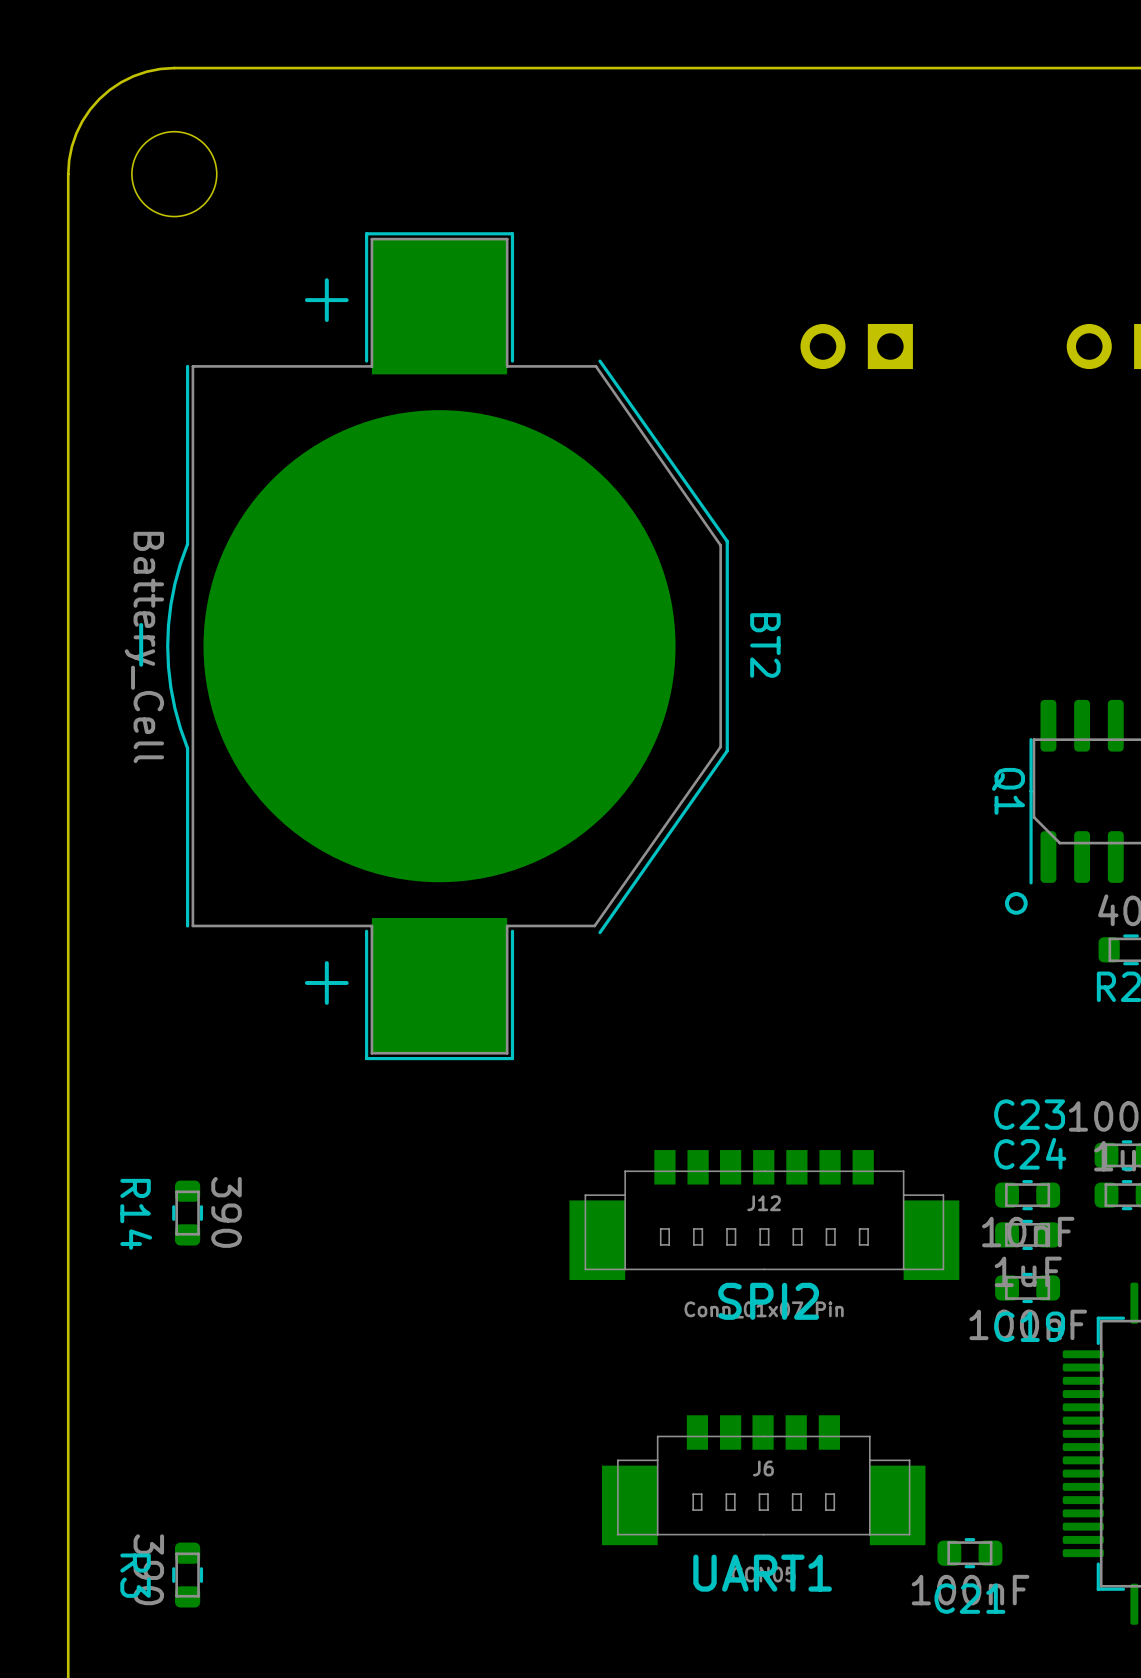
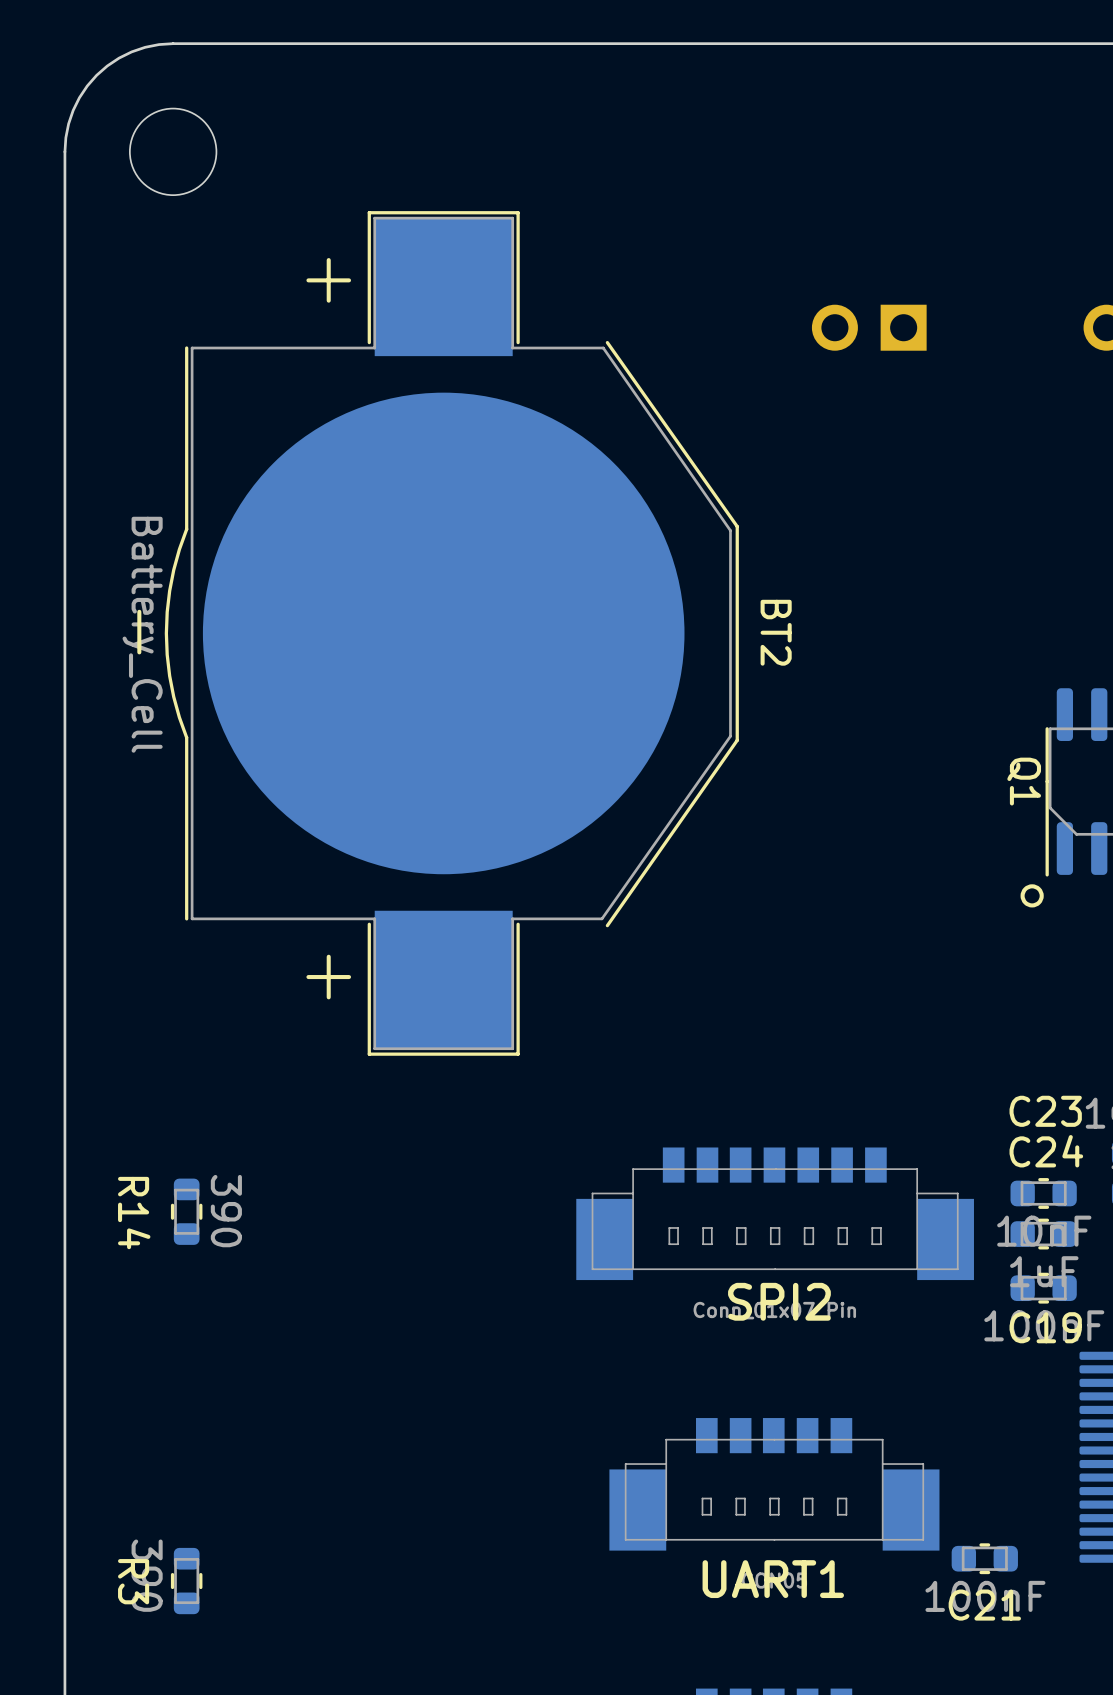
J12 name: J12 (764, 1203) -> none
J6 name: J6 (763, 1468) -> none

